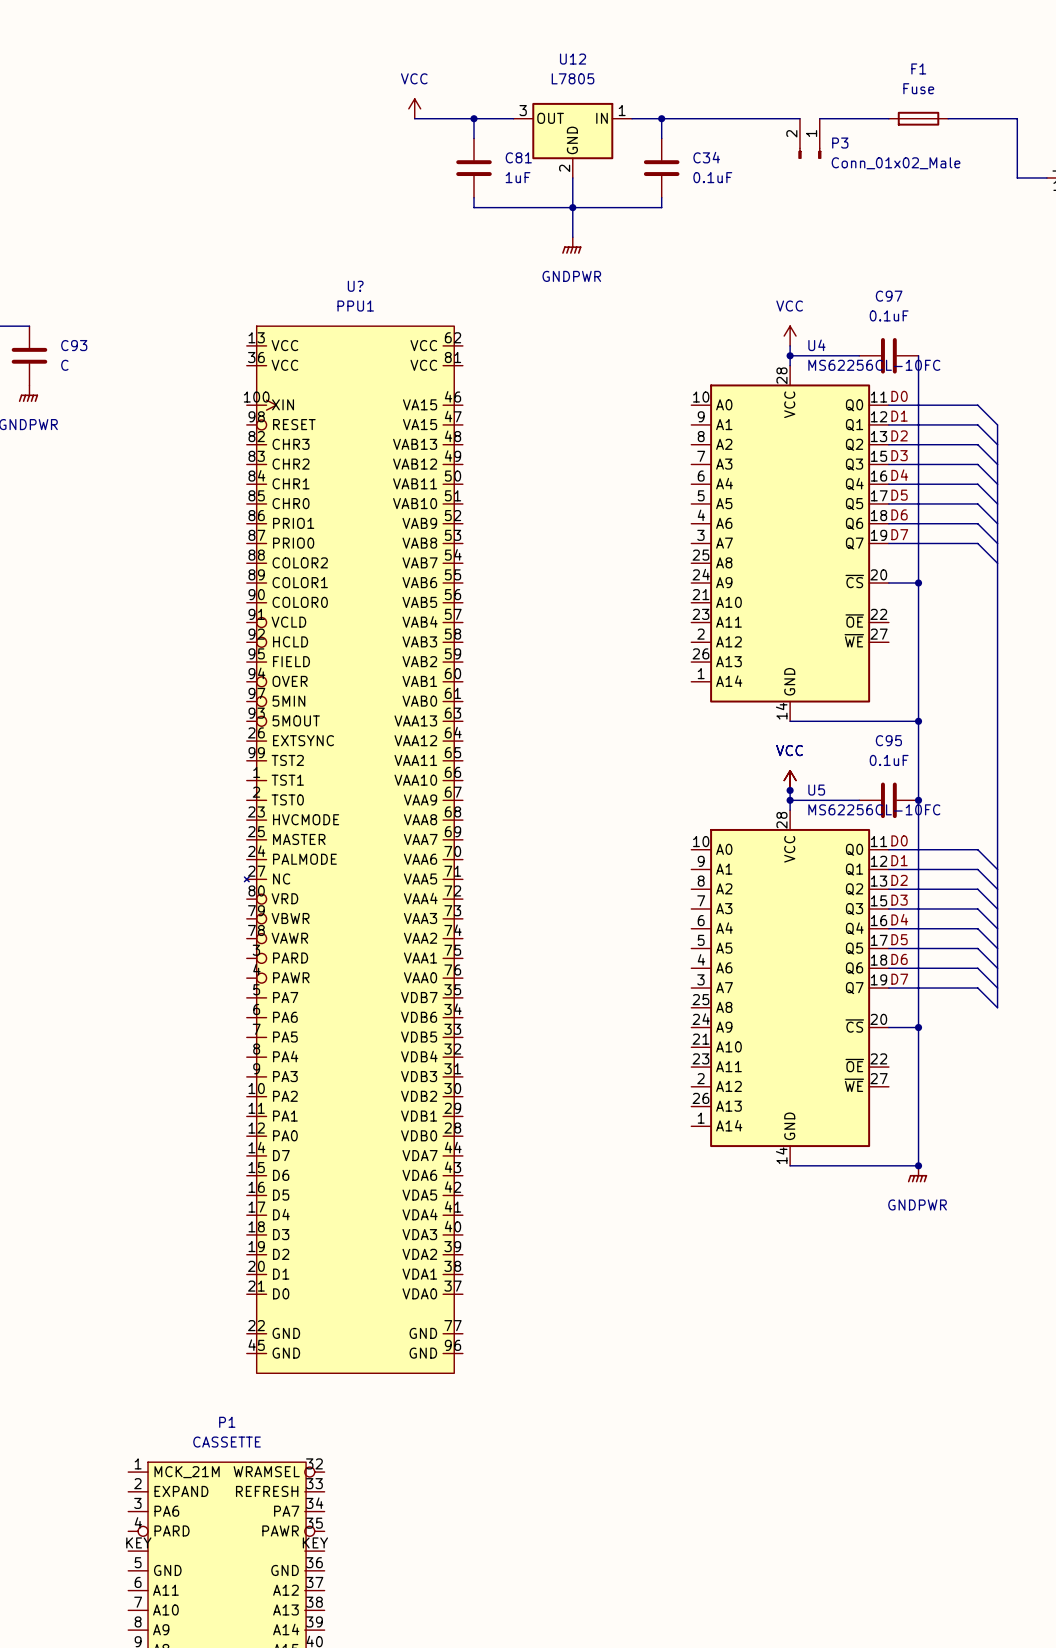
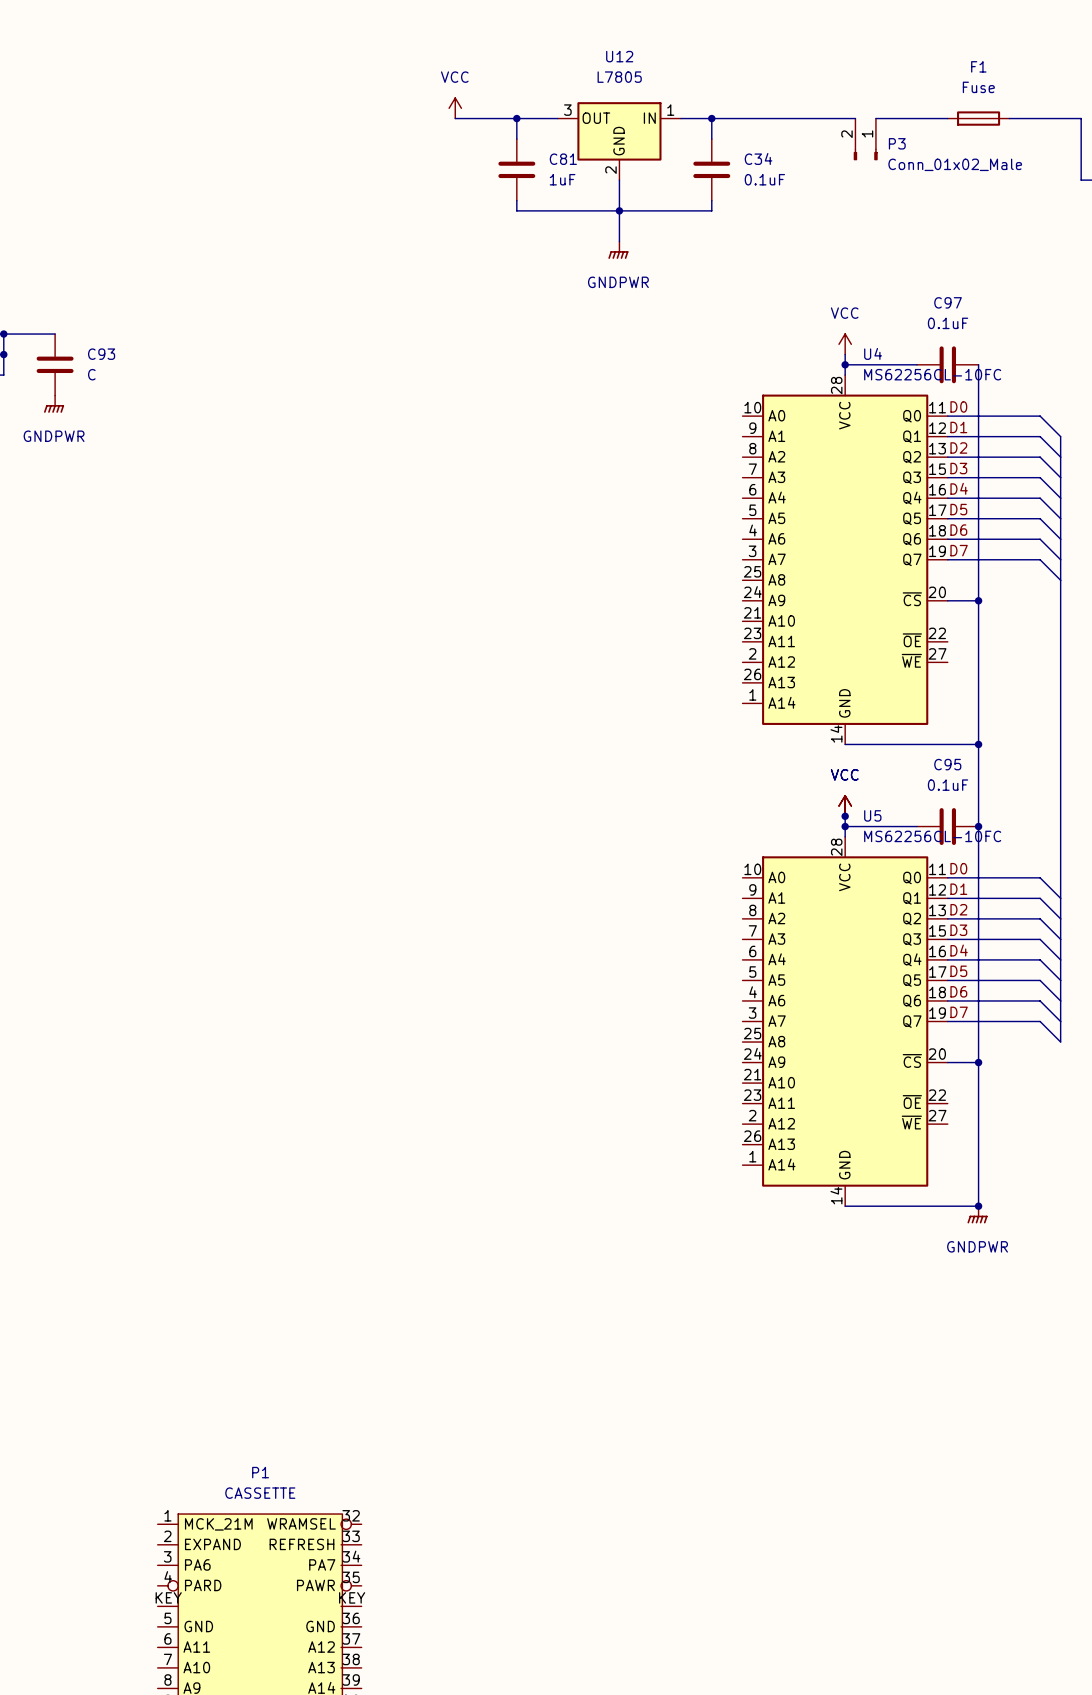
U?: PPU1 (353, 849) -> none

